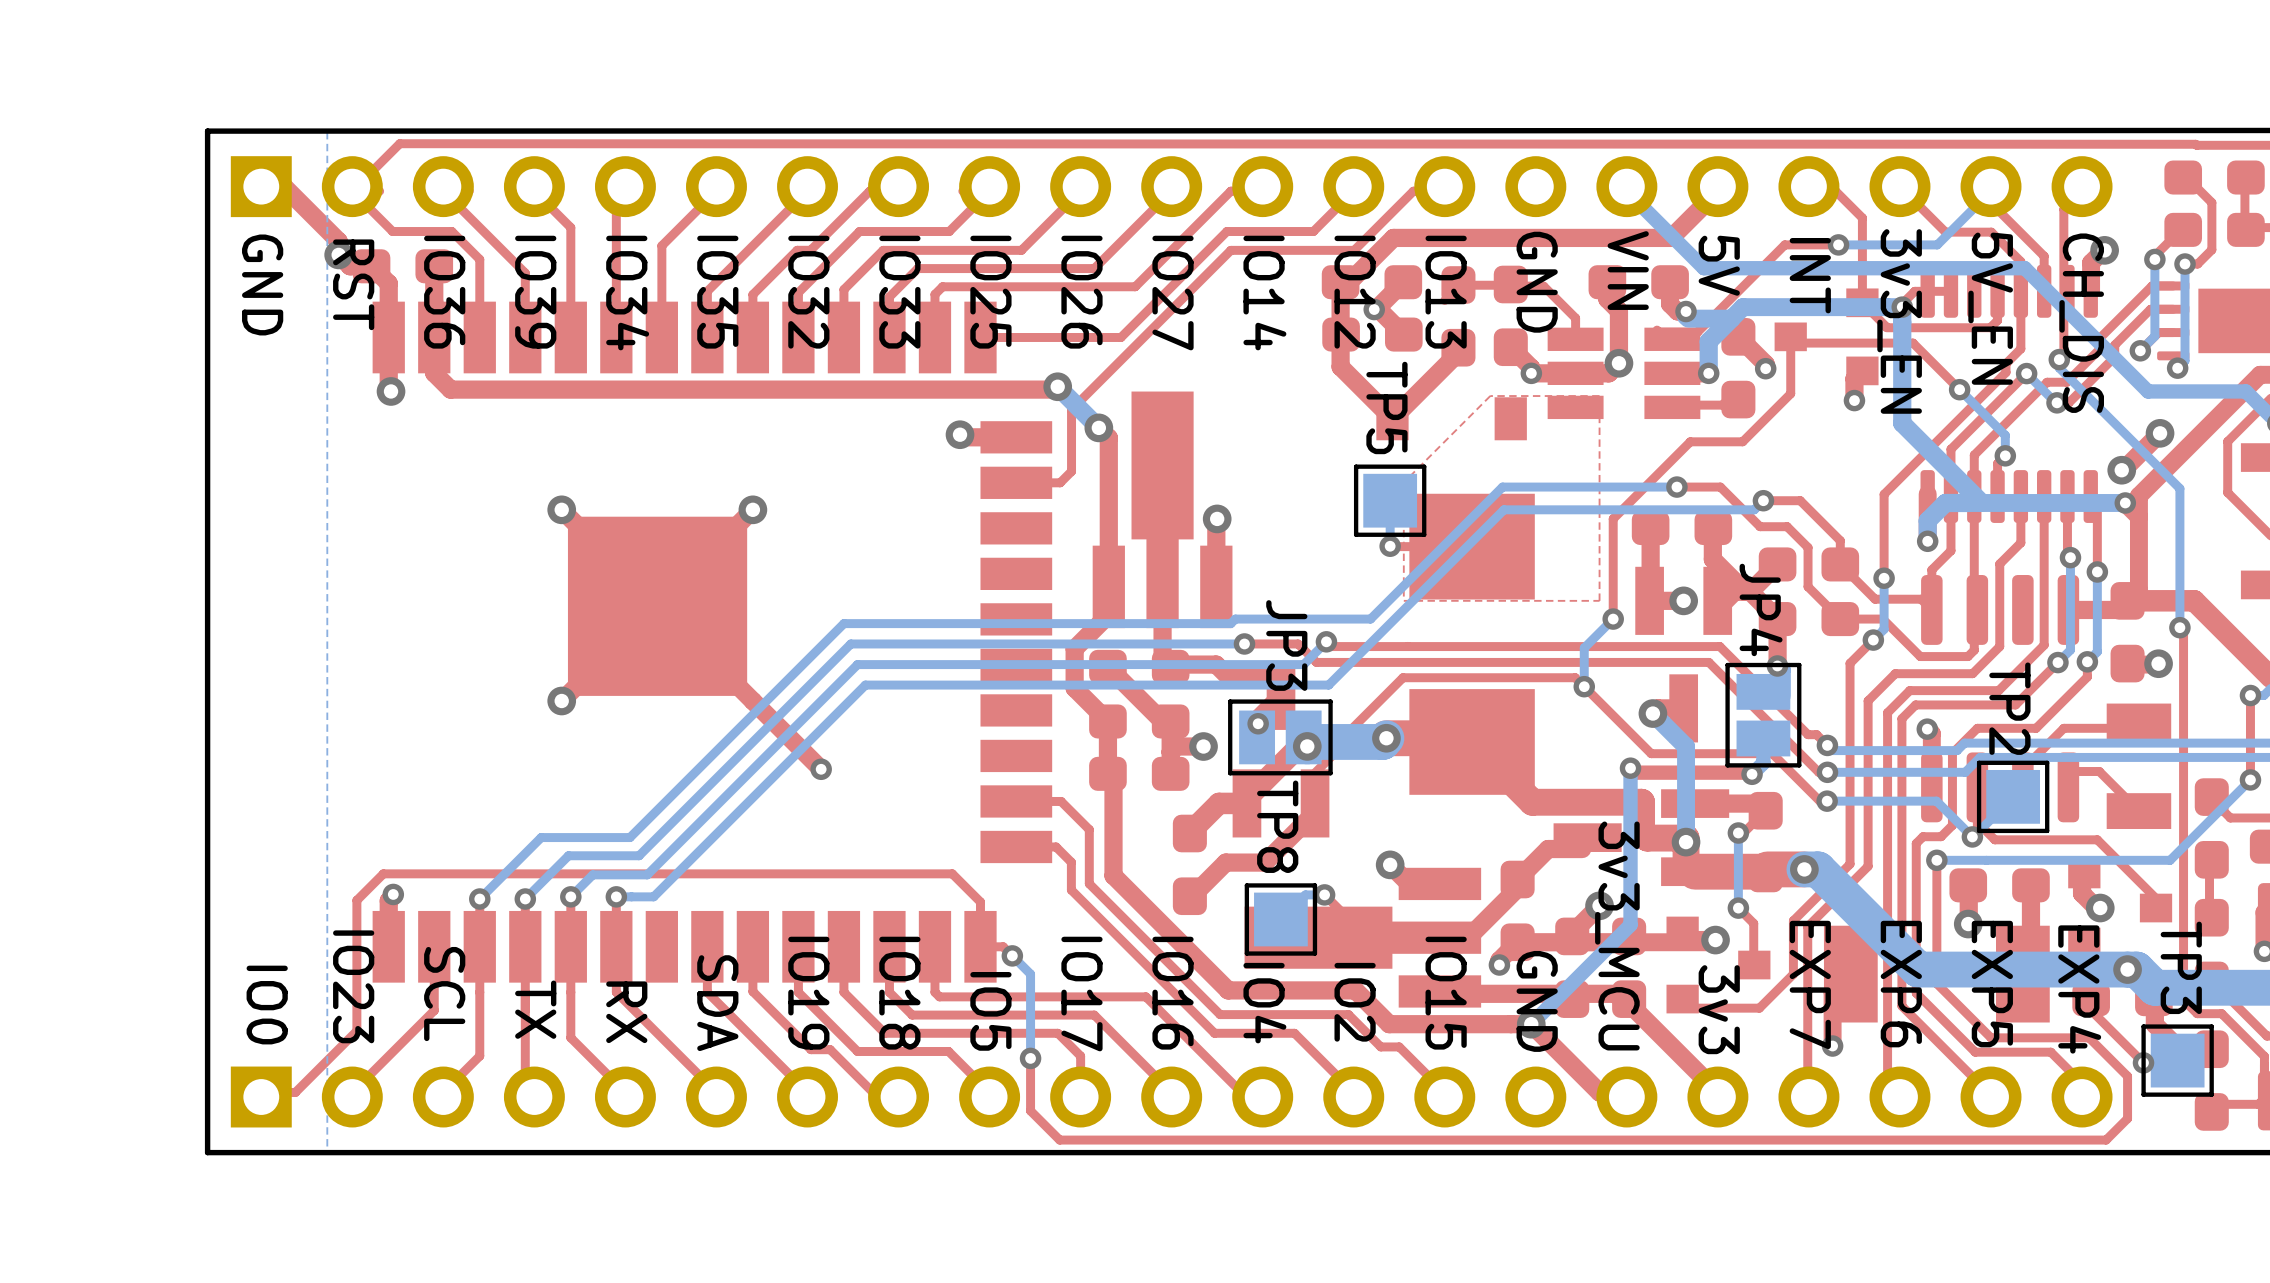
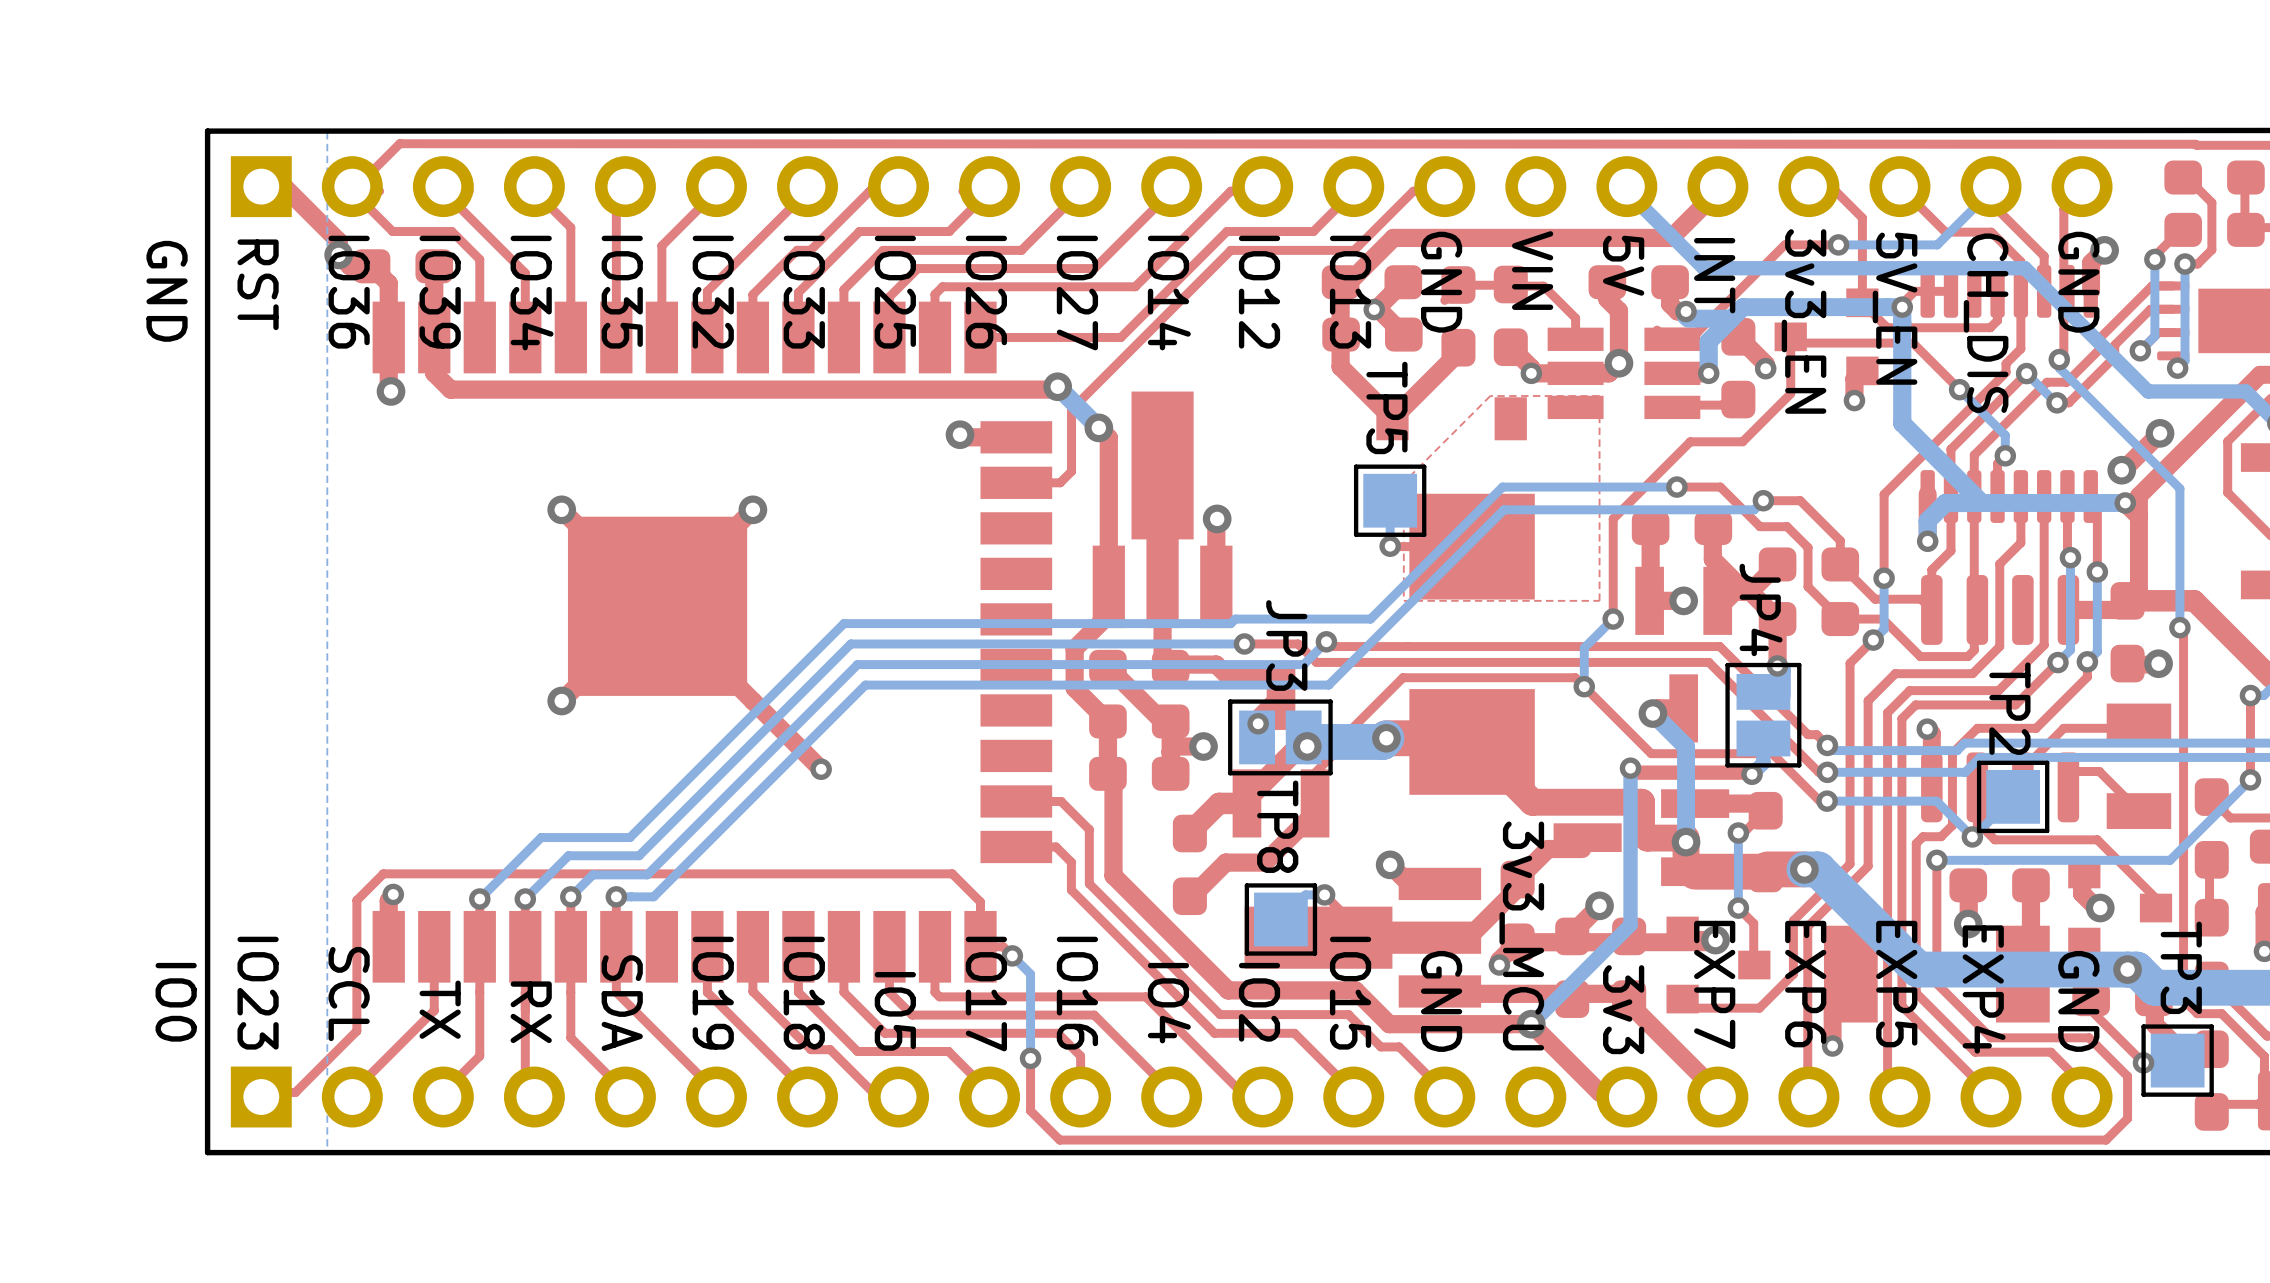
text position: 5V (1719, 265) -> 5V (1623, 265)
text position: VIN (1628, 270) -> VIN (1532, 270)
text position: INT (1810, 275) -> INT (1714, 275)
text position: GND (1537, 282) -> GND (1441, 282)
text: none -> GND (2078, 282)
text position: GND (262, 284) -> GND (167, 291)
text position: RST (353, 284) -> RST (258, 284)
text position: IO36 (444, 292) -> IO36 (349, 292)
text position: IO39 (535, 292) -> IO39 (440, 292)
text position: IO35 (717, 292) -> IO35 (622, 292)
text position: IO32 (808, 292) -> IO32 (713, 292)
text position: IO33 (899, 292) -> IO33 (804, 292)
text position: IO25 (990, 292) -> IO25 (895, 292)
text position: IO26 (1081, 292) -> IO26 (986, 292)
text position: IO12 (1355, 292) -> IO12 (1259, 292)
text position: IO13 (1446, 292) -> IO13 (1350, 292)
text position: IO34 (627, 293) -> IO34 (532, 293)
text position: IO27 (1173, 293) -> IO27 (1077, 293)
text position: IO14 (1264, 293) -> IO14 (1169, 293)
text position: 5V_EN (1990, 308) -> 5V_EN (1895, 308)
text position: 3v3_EN (1899, 321) -> 3v3_EN (1804, 321)
text position: CH_DIS (2081, 323) -> CH_DIS (1986, 323)
text position: 3v3_MCU (1617, 935) -> 3v3_MCU (1521, 935)
text position: EXP7 (1810, 984) -> EXP7 (1714, 984)
text position: EXP6 (1901, 984) -> EXP6 (1805, 984)
text position: EXP5 (1992, 984) -> EXP5 (1896, 984)
text position: IO23 (353, 986) -> IO23 (258, 993)
text position: EXP4 (2079, 989) -> EXP4 (1984, 989)
text position: IO19 (808, 993) -> IO19 (713, 993)
text position: IO18 (899, 993) -> IO18 (804, 993)
text position: IO16 (1173, 993) -> IO16 (1077, 993)
text position: IO15 (1446, 993) -> IO15 (1350, 993)
text position: SCL (444, 994) -> SCL (349, 994)
text position: IO17 (1081, 994) -> IO17 (986, 994)
text position: GND (1537, 1001) -> GND (1441, 1001)
text: none -> GND (2078, 1001)
text position: IO2 (1355, 1002) -> IO2 (1259, 1002)
text position: SDA (717, 1003) -> SDA (622, 1003)
text position: IO4 (1264, 1003) -> IO4 (1169, 1003)
text position: IO0 (267, 1005) -> IO0 (176, 1002)
text position: TX (535, 1009) -> TX (440, 1009)
text position: 3v3 (1719, 1009) -> 3v3 (1623, 1009)
text position: IO5 (990, 1011) -> IO5 (895, 1011)
text position: RX (626, 1012) -> RX (531, 1012)

